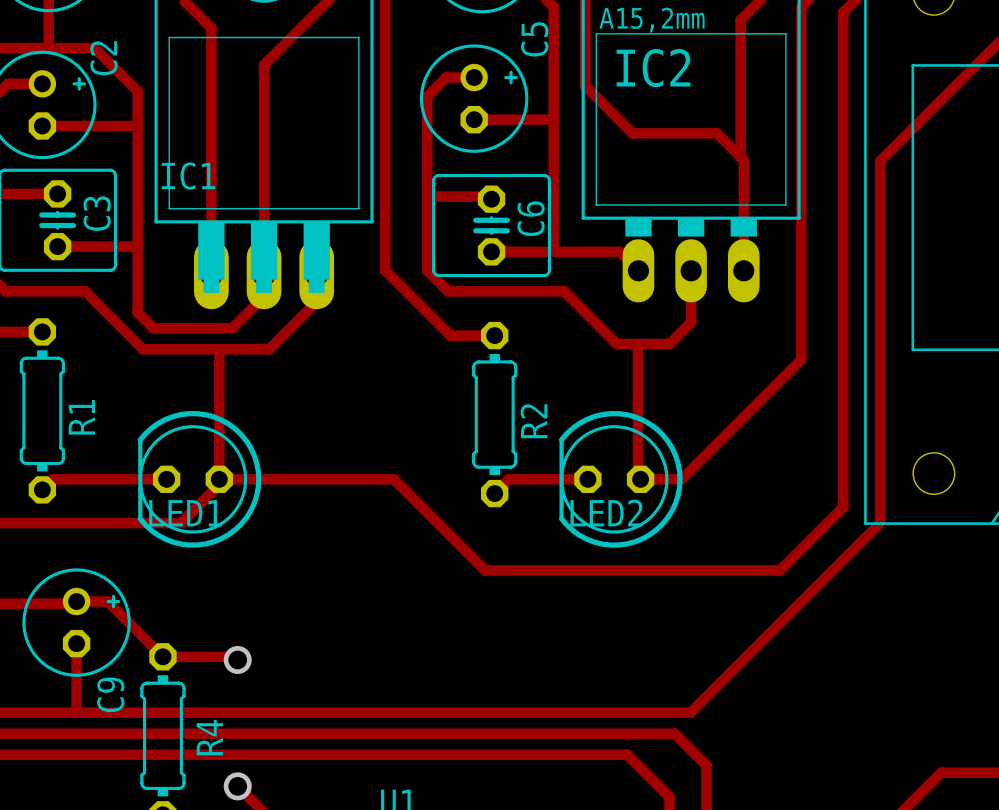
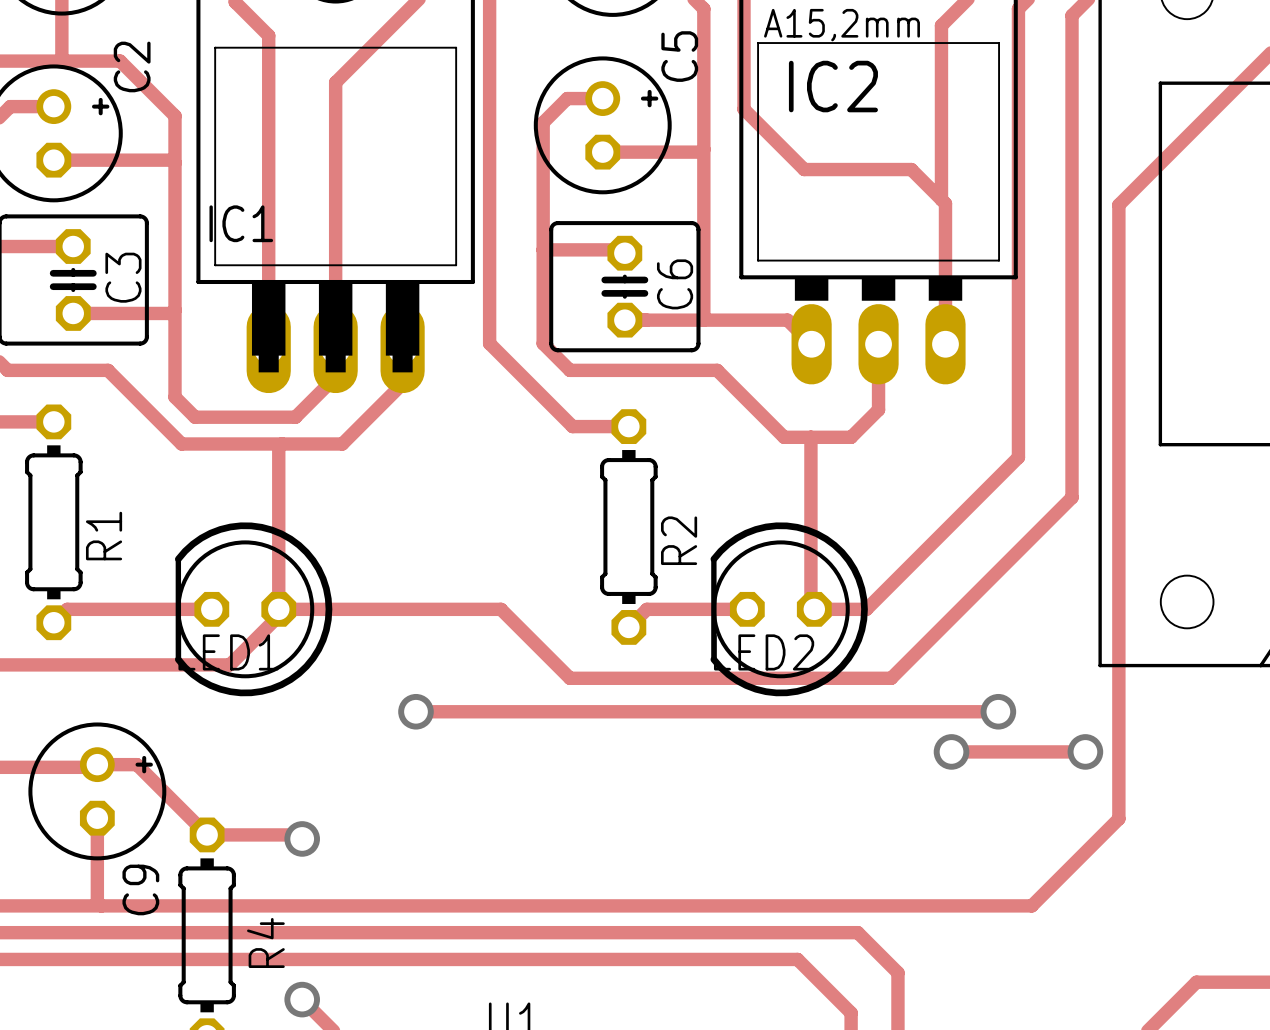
track: (843, 391) (843, 507) (780, 570) (485, 570) (448, 533) -> (1072, 497) (891, 678) (569, 678)
track: (880, 523) (690, 712) -> (1118, 664) (1118, 818) (1031, 905) (877, 905)
track: none -> (415, 711) (998, 711)
via: none -> (415, 711)
via: none -> (998, 711)
track: none -> (951, 751) (1085, 751)
via: none -> (951, 751)
via: none -> (1085, 751)

